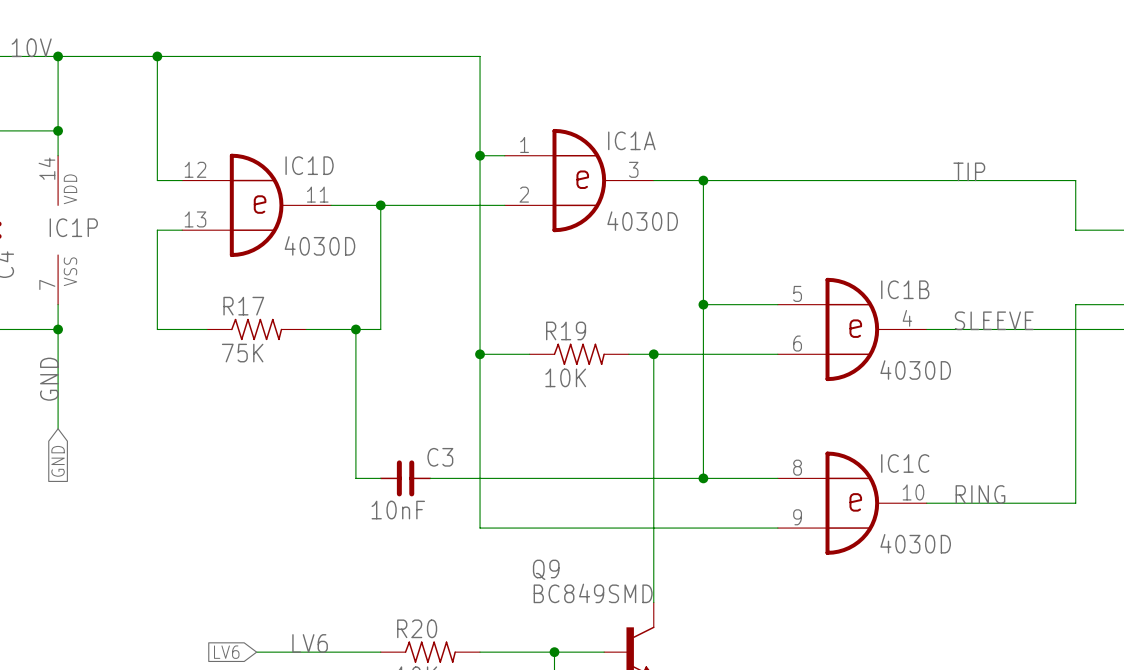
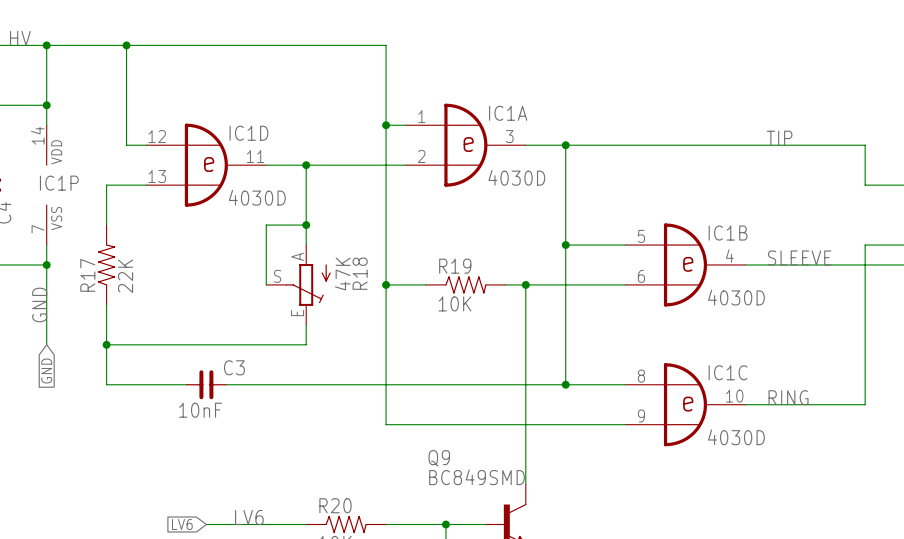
label: 10V (31, 47) -> HV (20, 38)
wire: (157, 230) (157, 329) (207, 329) -> (126, 185) (106, 185) (106, 225)
wire: none -> (306, 225) (266, 225) (266, 284)
wire: (380, 304) (380, 329) (306, 329) -> none
R17 rotation: 0° (256, 329) -> 90° counterclockwise (106, 264)
R17 position: (256, 329) -> (106, 264)
wire: (355, 329) (355, 478) -> (226, 384) (286, 384)
junction position: (355, 329) -> (306, 225)
R17 value: 75K (242, 353) -> 22K (125, 276)
R18: none -> 47K (298, 284)
wire: none -> (106, 304) (106, 384) (186, 384)
wire: none -> (306, 324) (306, 344) (106, 344)
junction: none -> (106, 344)
C3 position: (405, 478) -> (206, 384)

